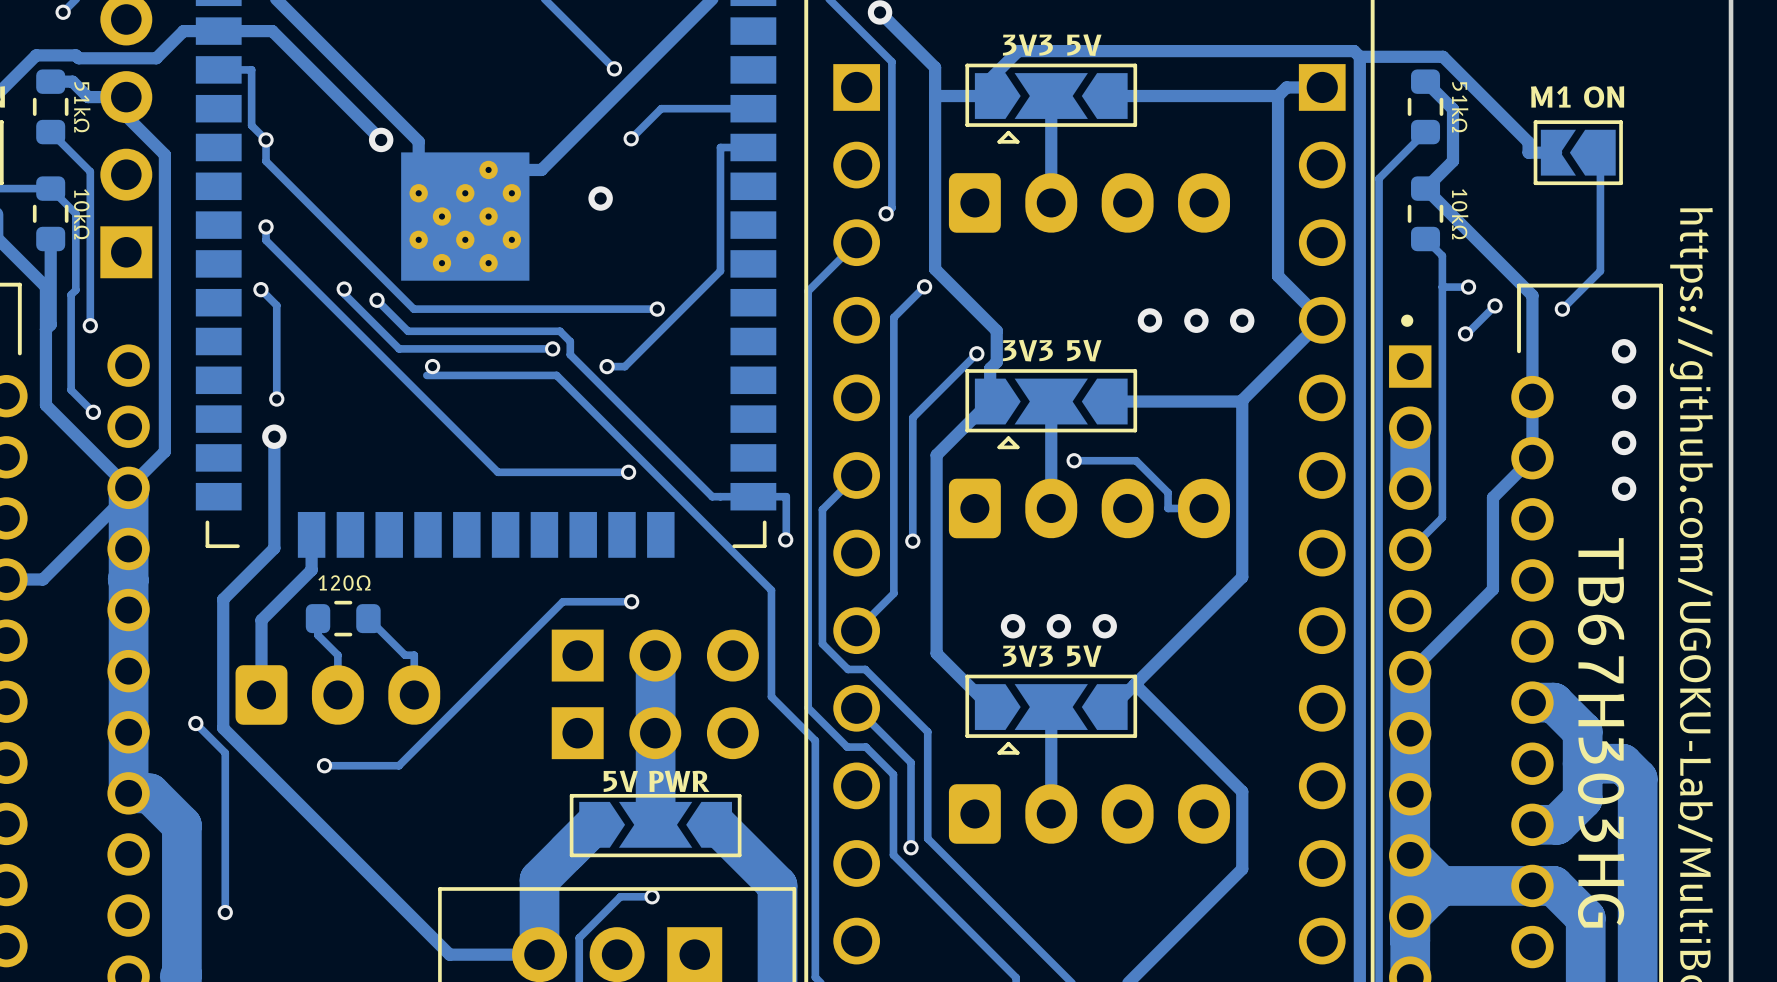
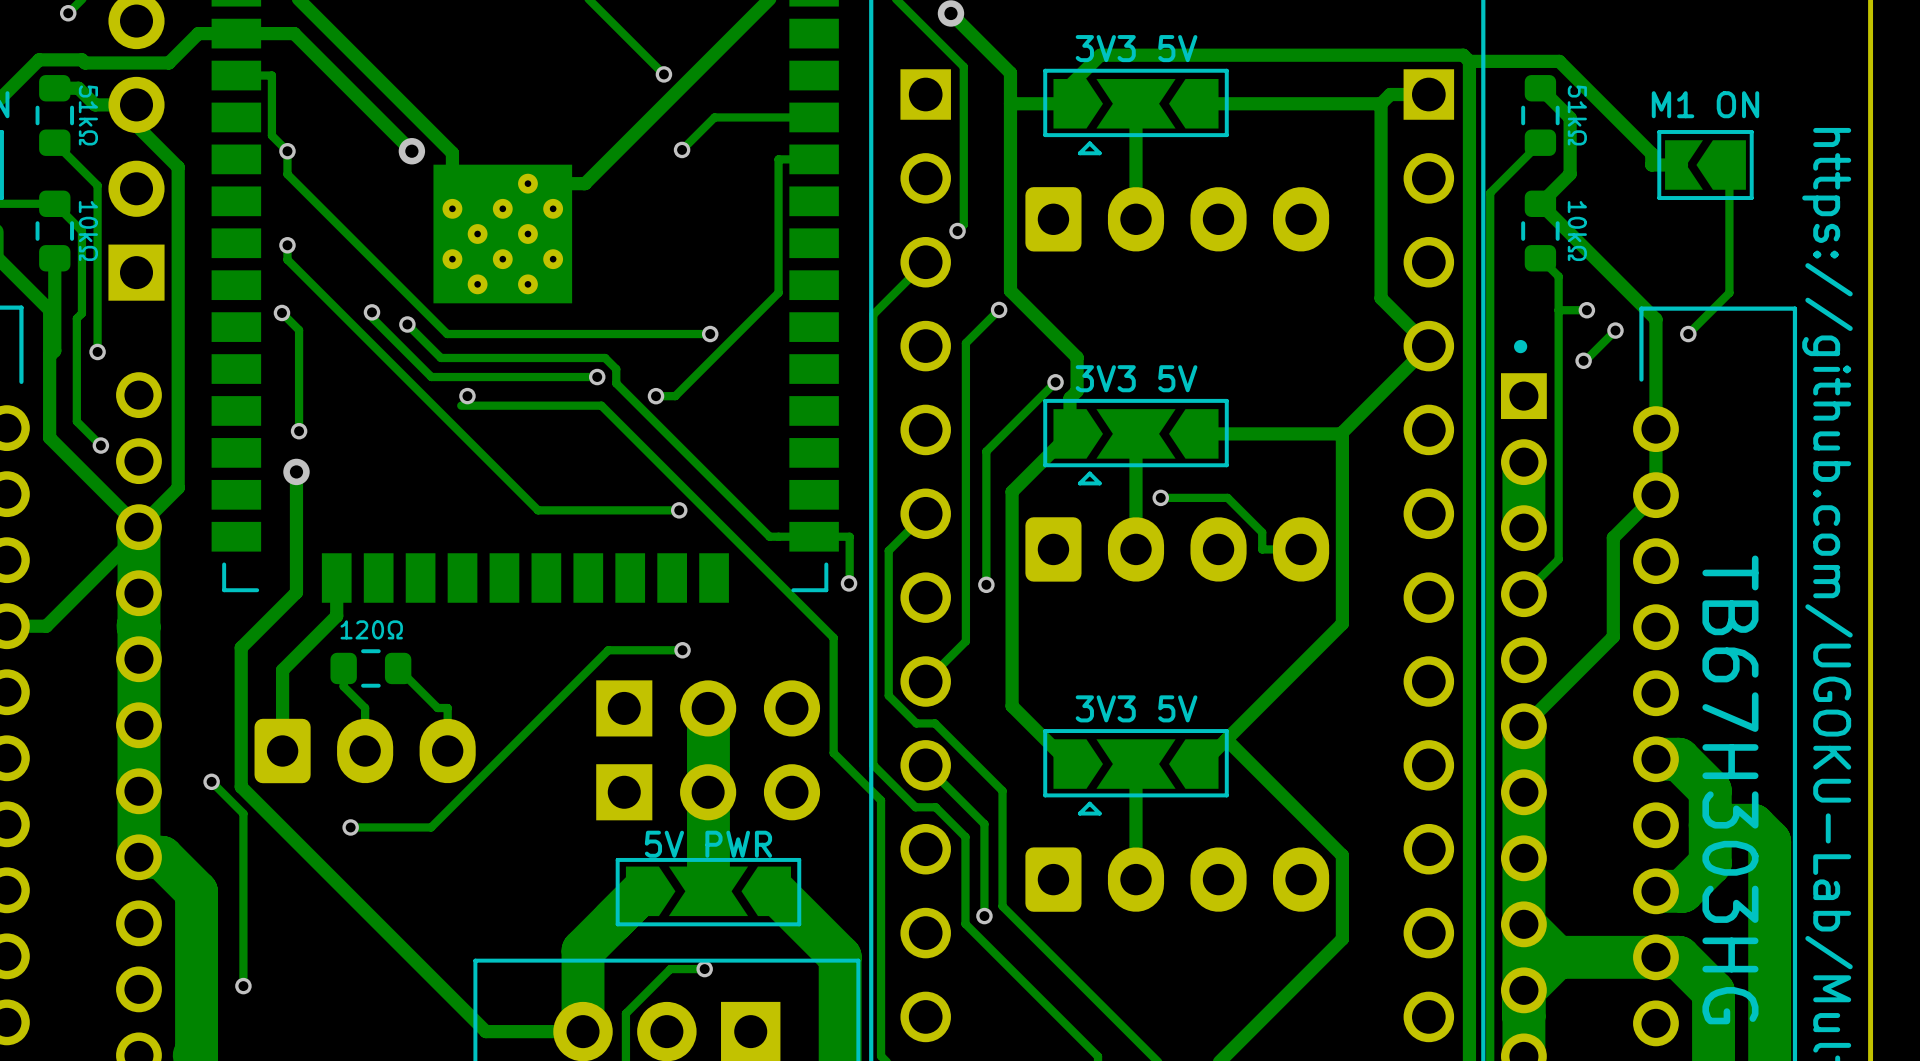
via: (600, 198) -> none
via: (1149, 320) -> none
via: (1196, 320) -> none
via: (1242, 320) -> none
via: (1624, 351) -> none
via: (1624, 397) -> none
via: (1624, 442) -> none
via: (1624, 488) -> none
via: (1013, 626) -> none
via: (1058, 626) -> none
via: (1104, 626) -> none

